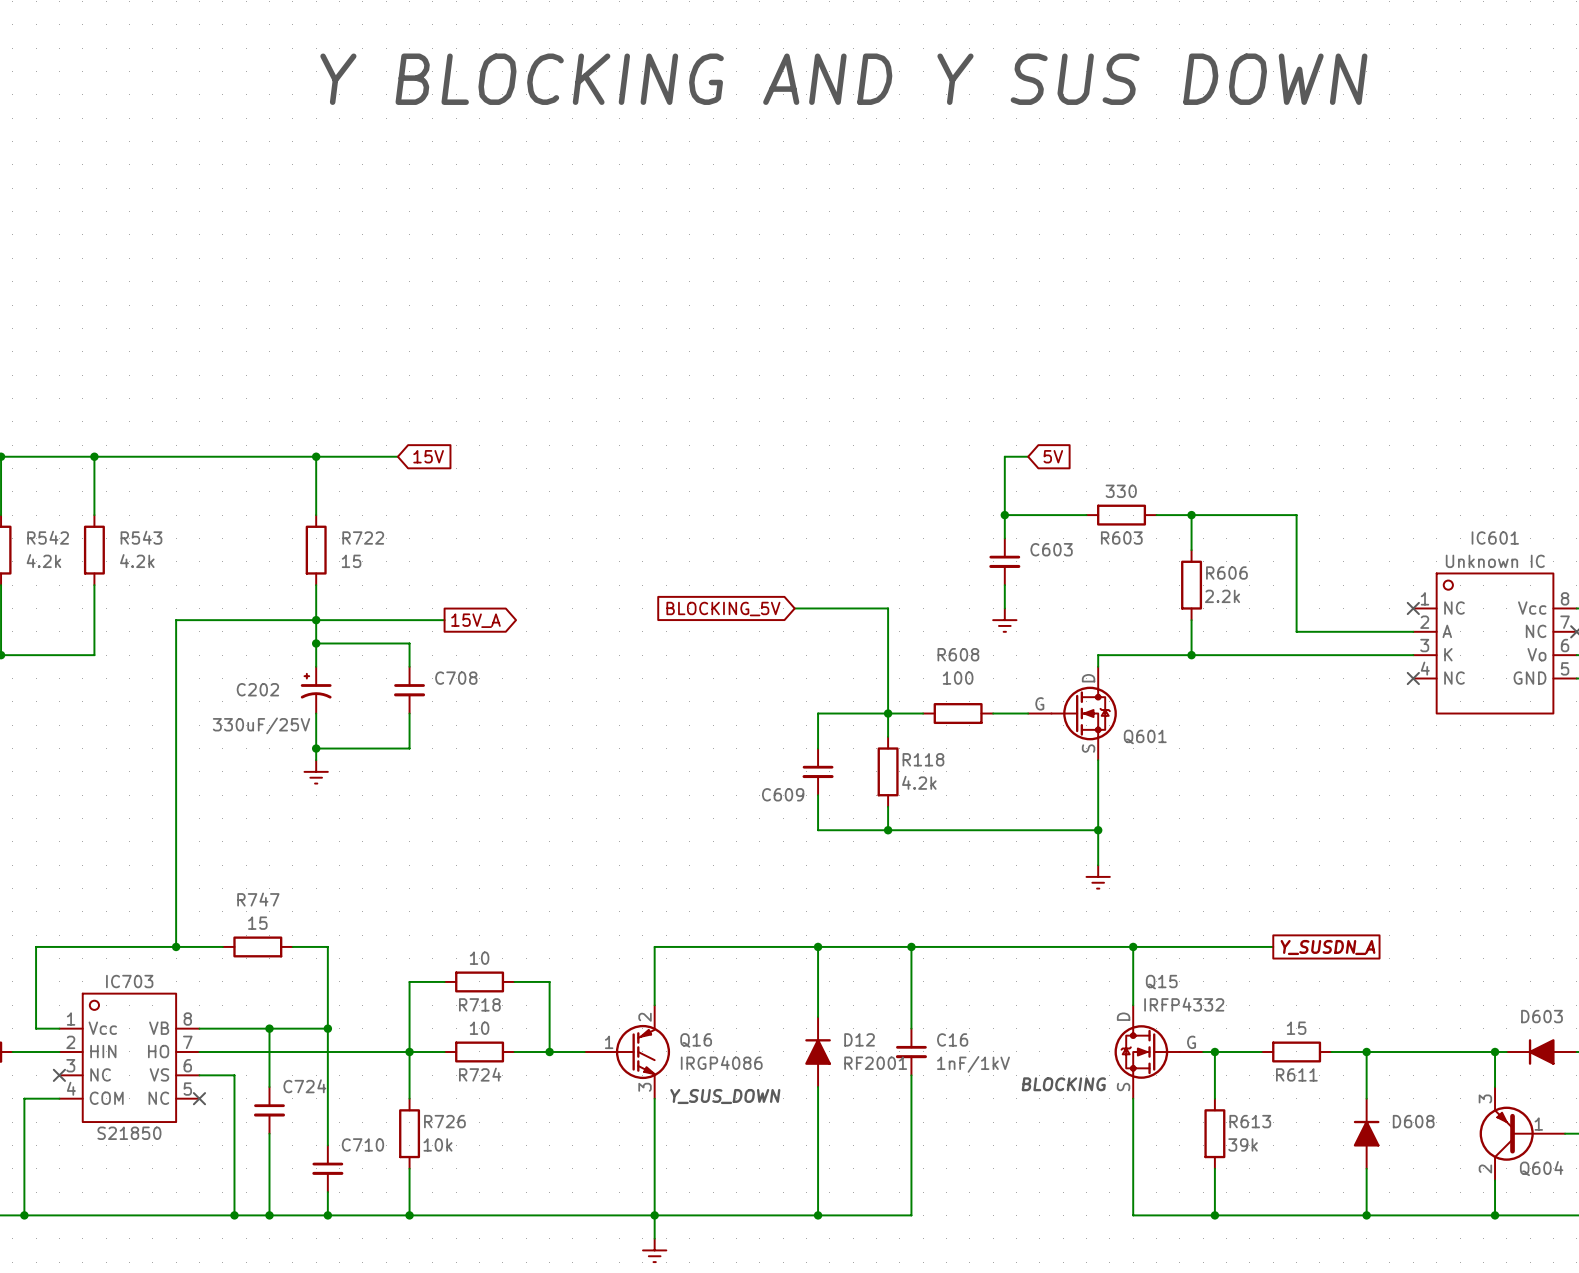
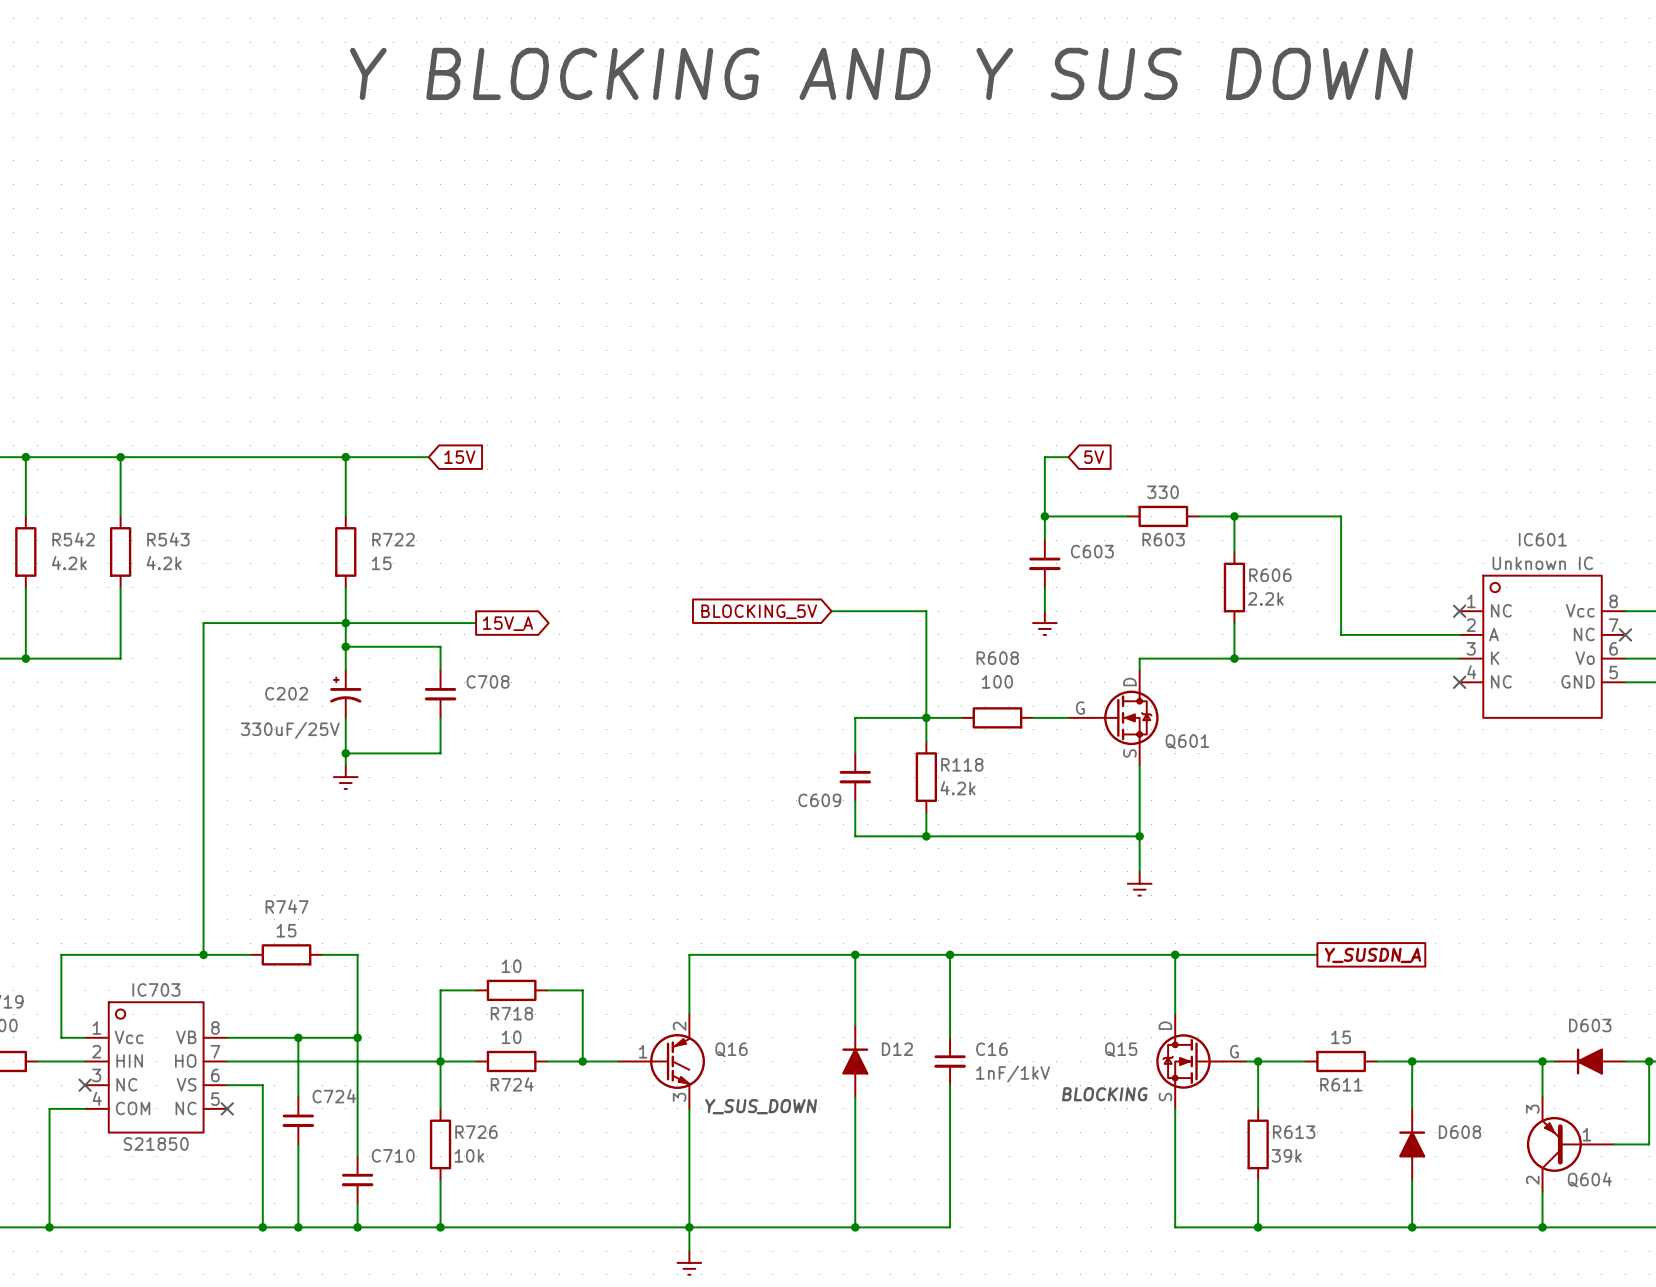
Q15 name position: Q15 (1161, 982) -> Q15 (1121, 1049)
Q15 value: IRFP4332 (1184, 1004) -> none
Q16 value: IRGP4086 (721, 1062) -> none
D12 value: RF2001 (875, 1063) -> none

